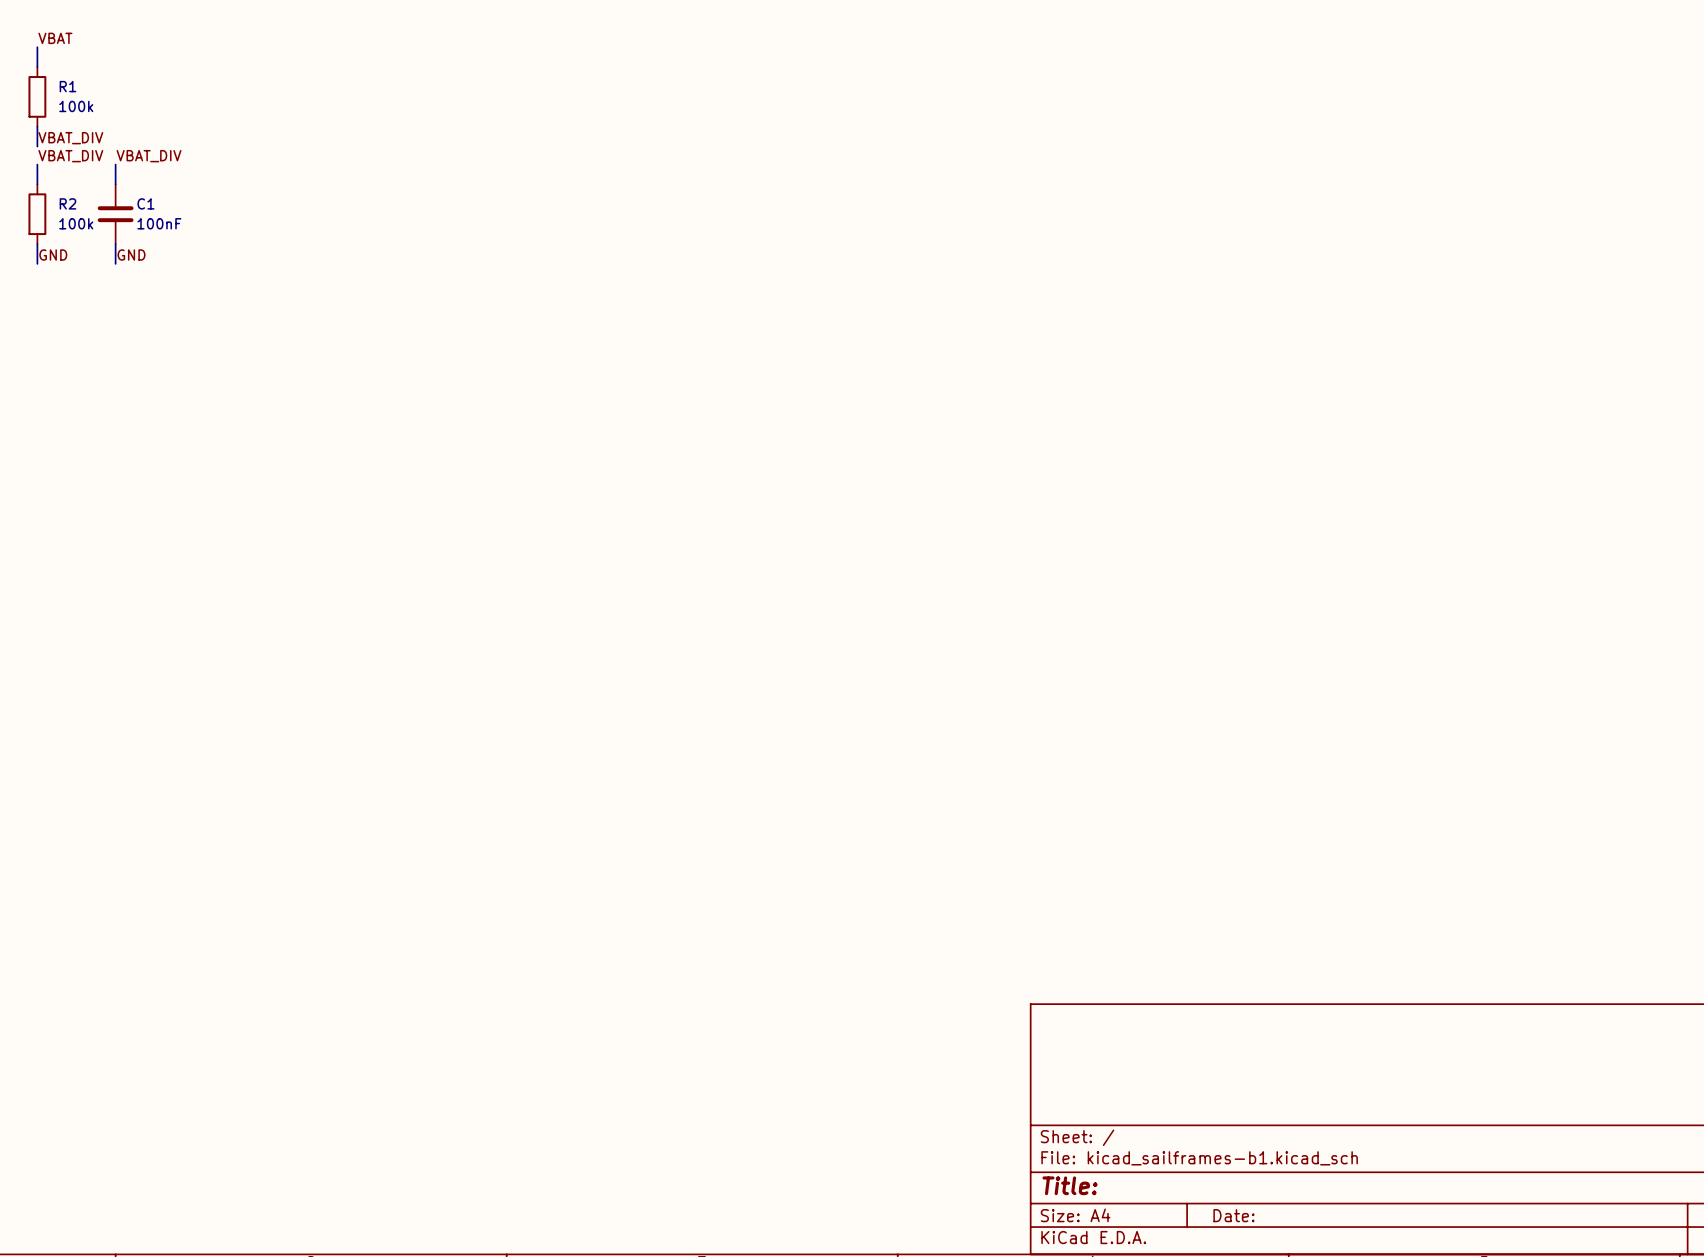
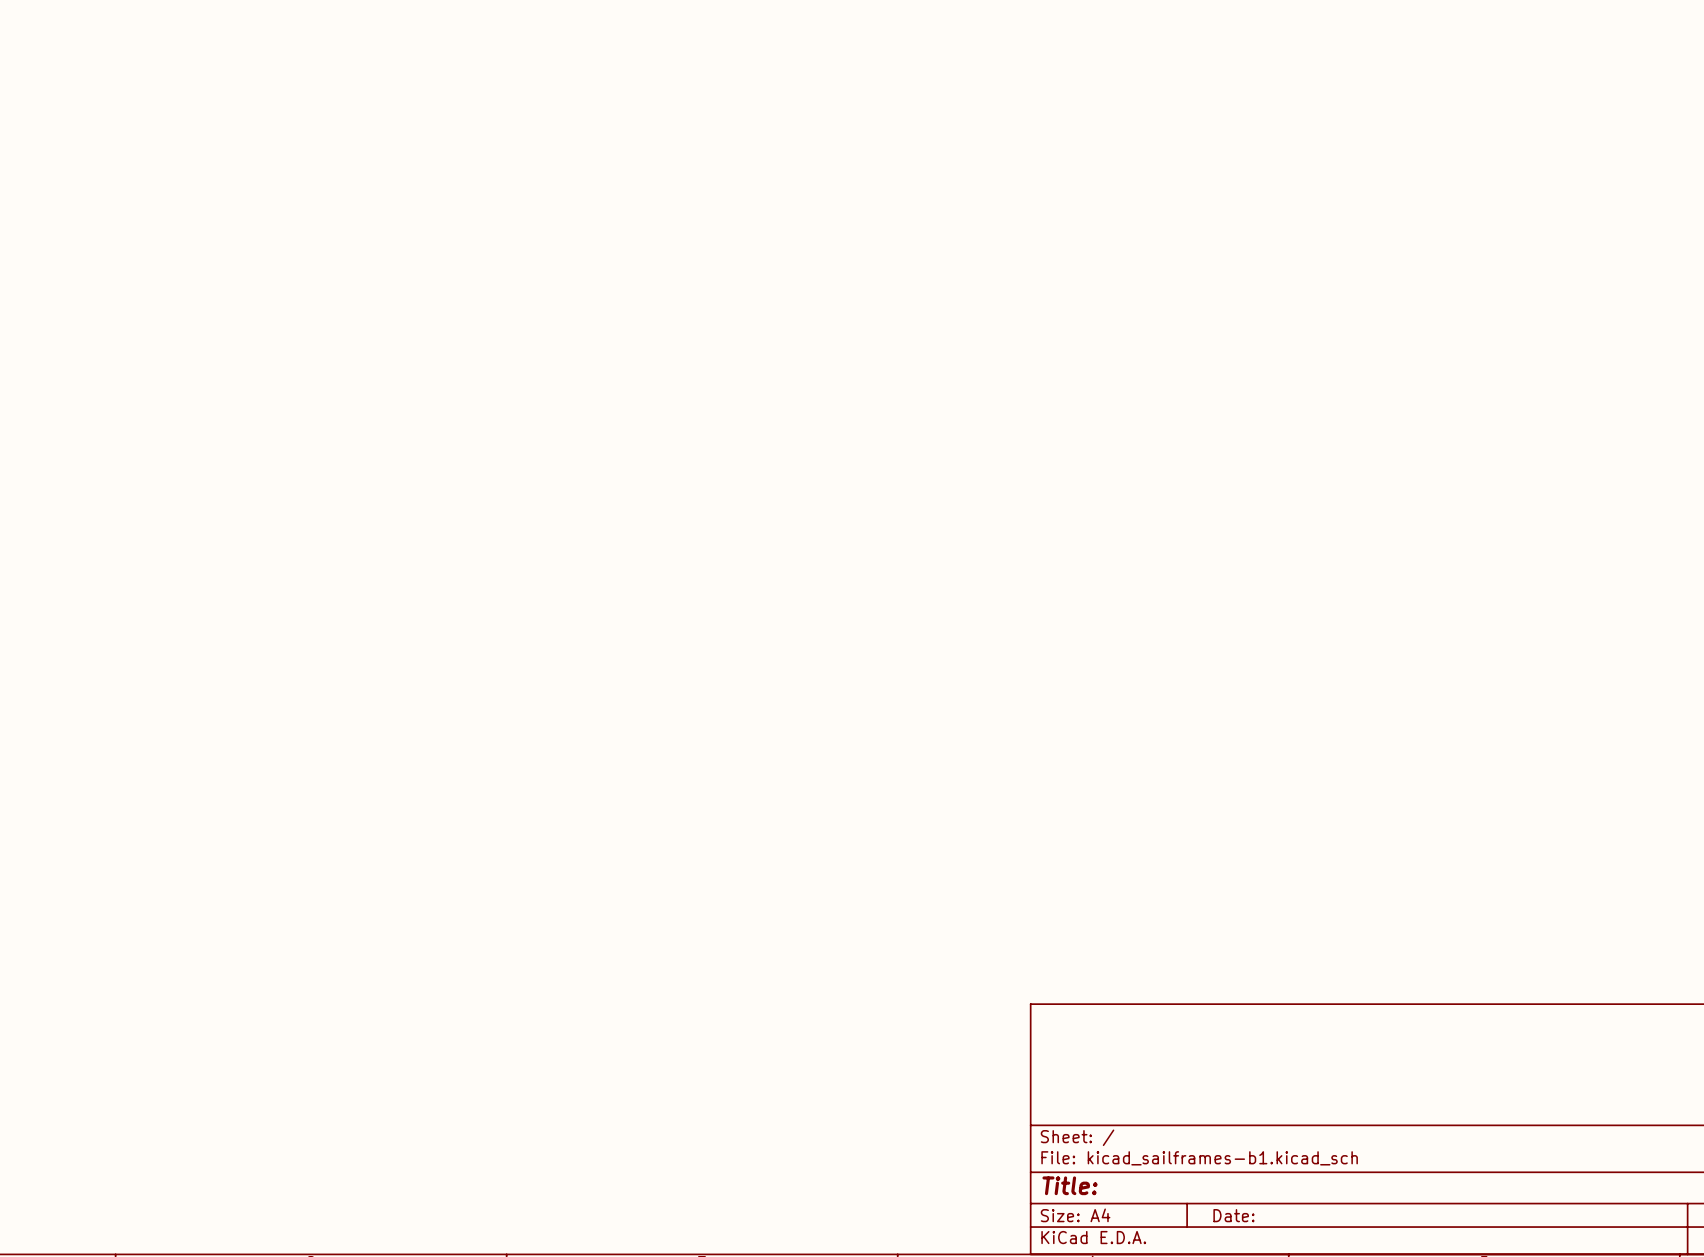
label: VBAT (55, 38) -> none
wire: (37, 47) (37, 67) -> none
R1: 100k (37, 96) -> none
wire: (37, 126) (37, 146) -> none
label: VBAT_DIV (70, 138) -> none
label: VBAT_DIV (70, 156) -> none
label: VBAT_DIV (149, 156) -> none
wire: (37, 164) (37, 184) -> none
wire: (115, 164) (115, 184) -> none
R2: 100k (37, 214) -> none
C1: 100nF (115, 214) -> none
wire: (37, 244) (37, 263) -> none
wire: (115, 244) (115, 263) -> none
label: GND (53, 255) -> none
label: GND (131, 255) -> none

